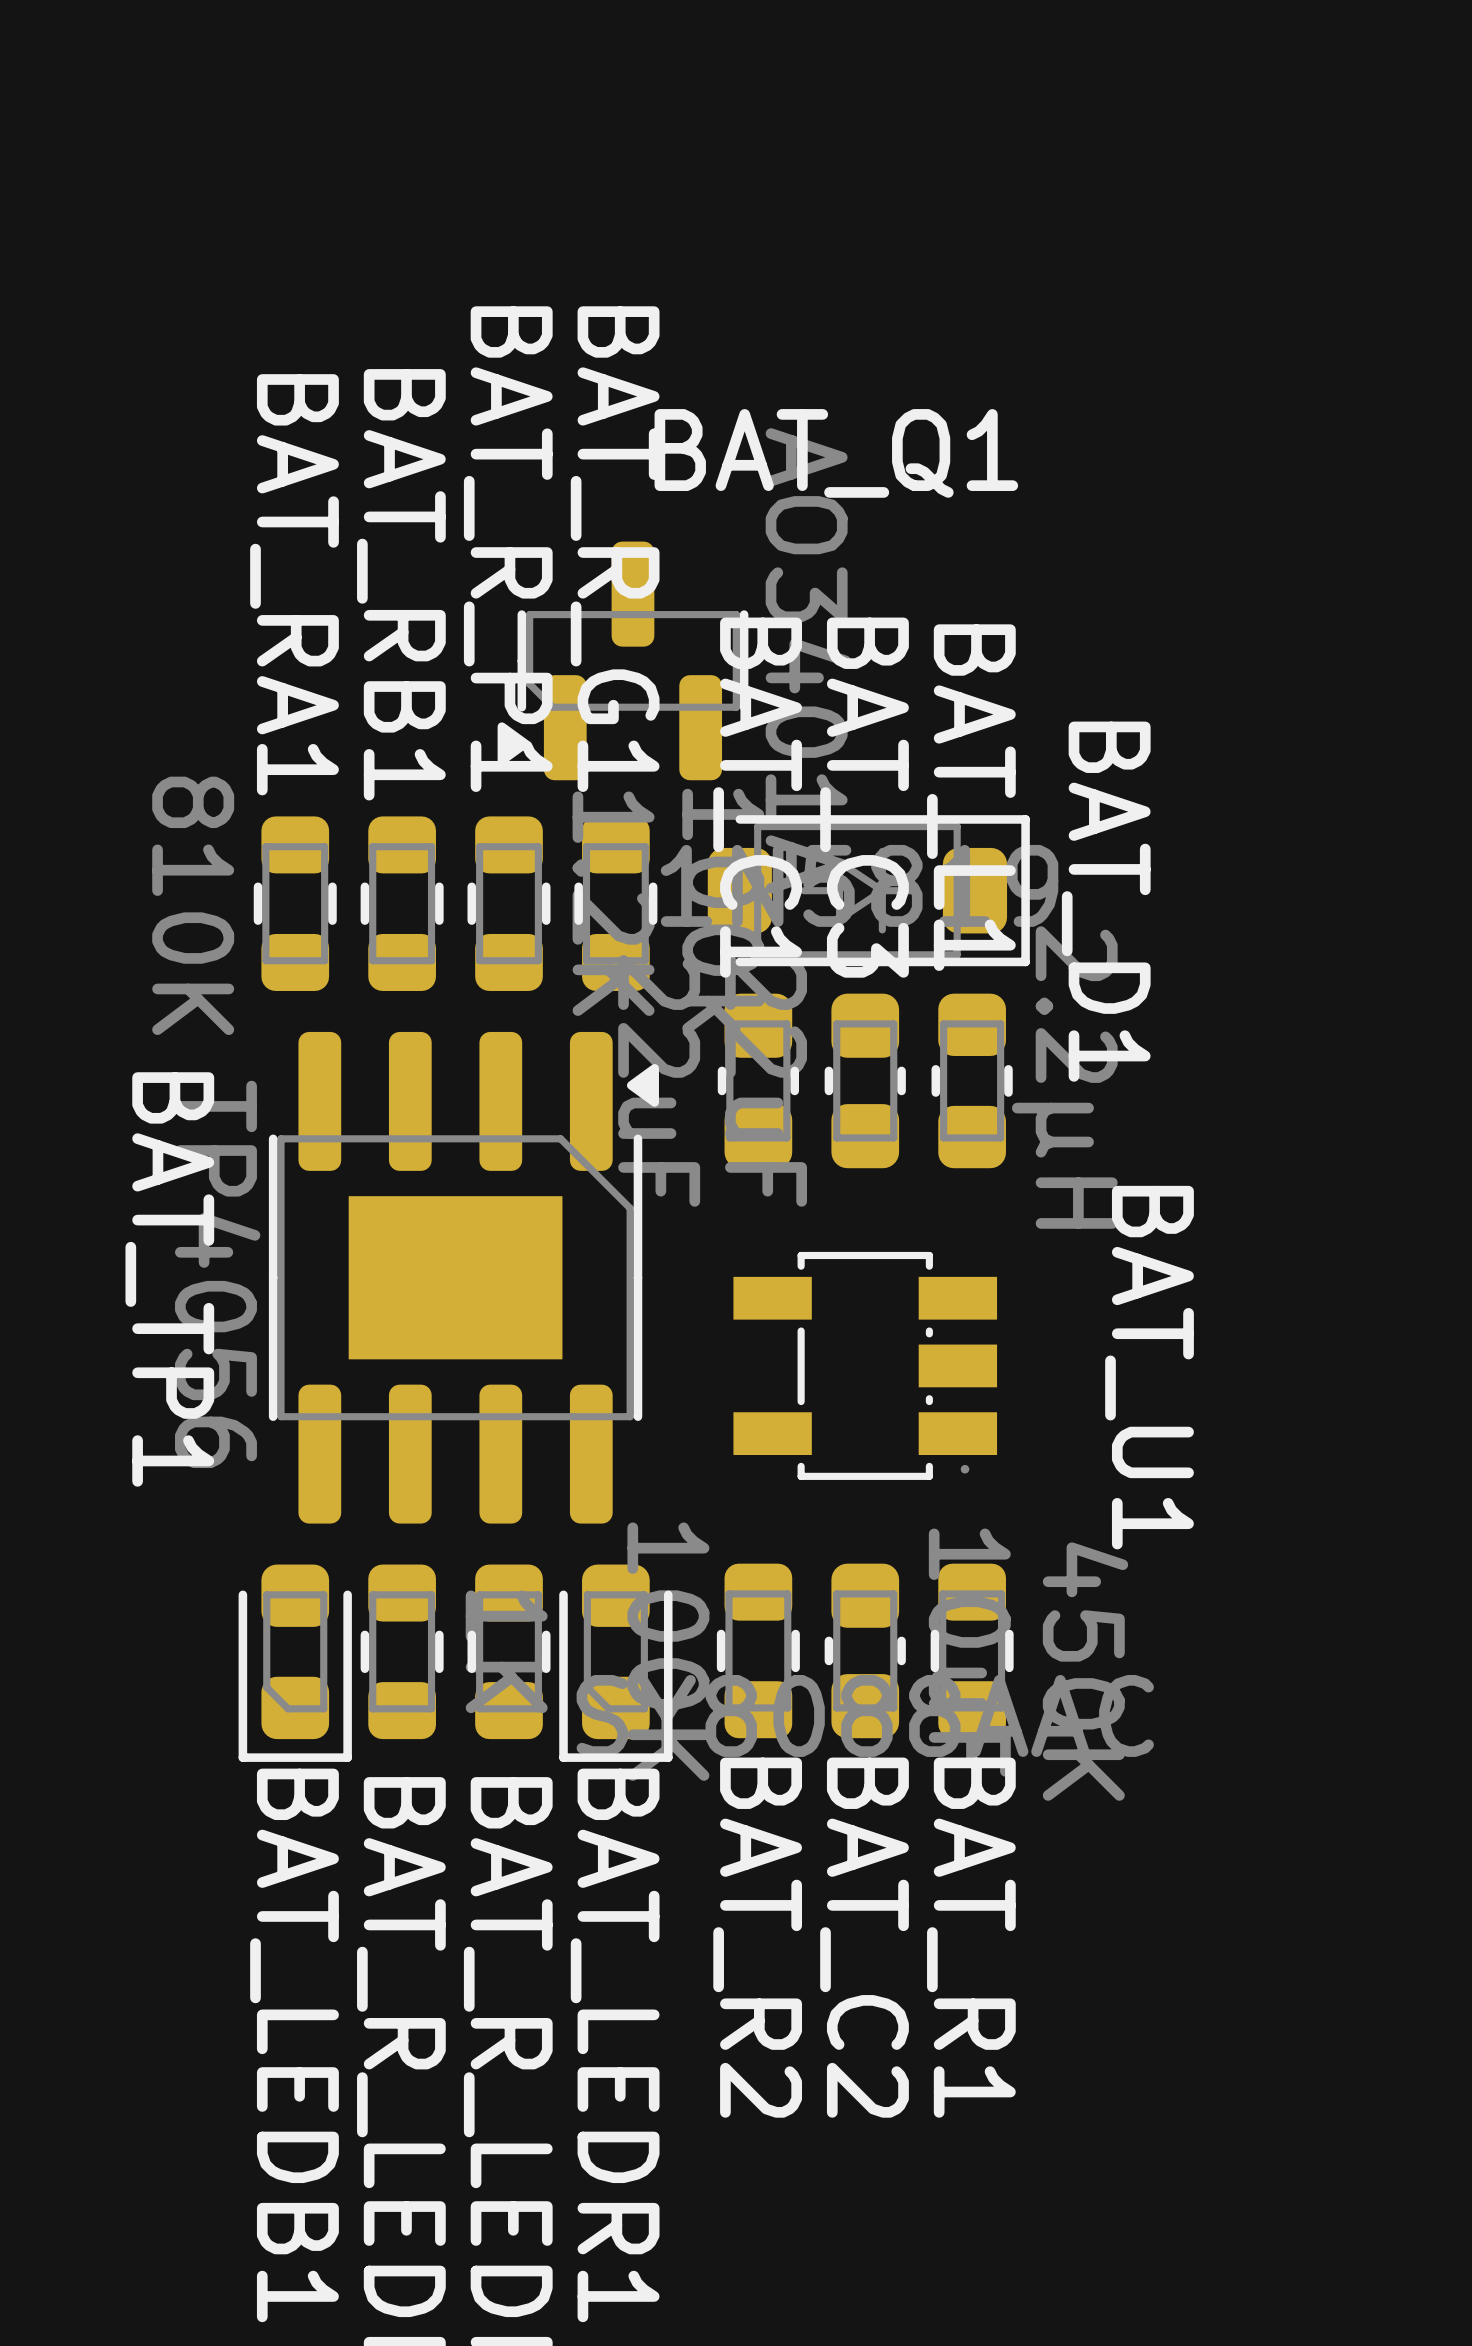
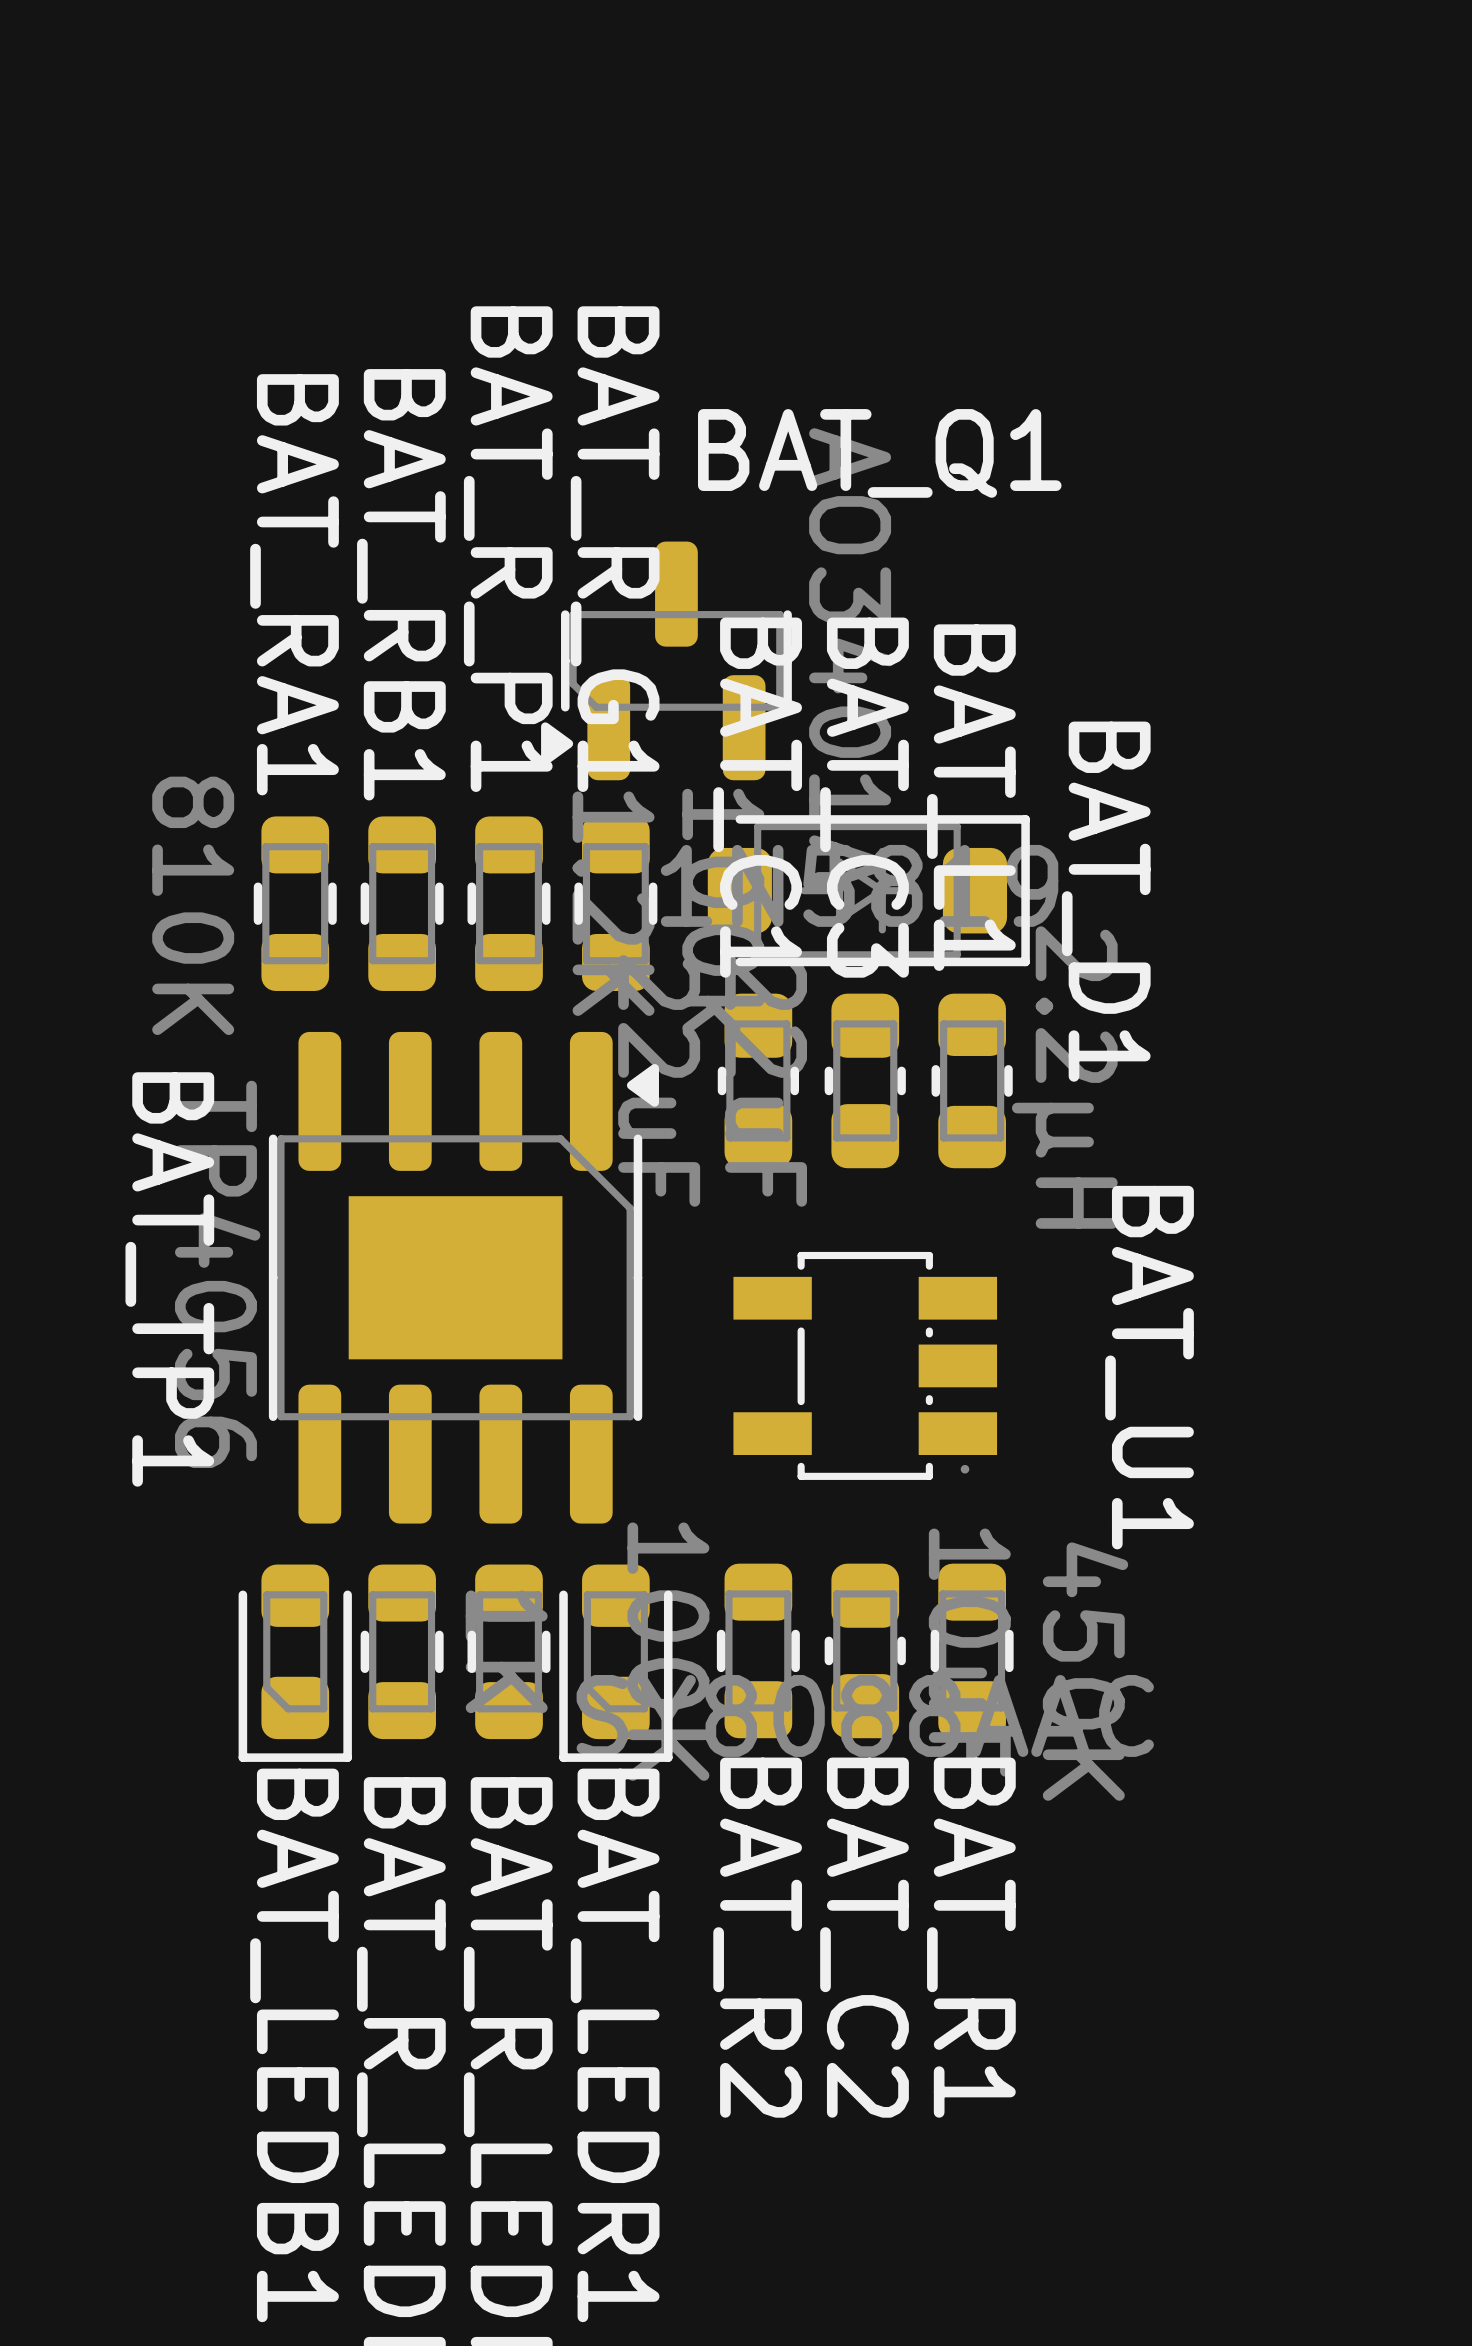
BAT_Q1 position: (623, 660) -> (666, 660)

